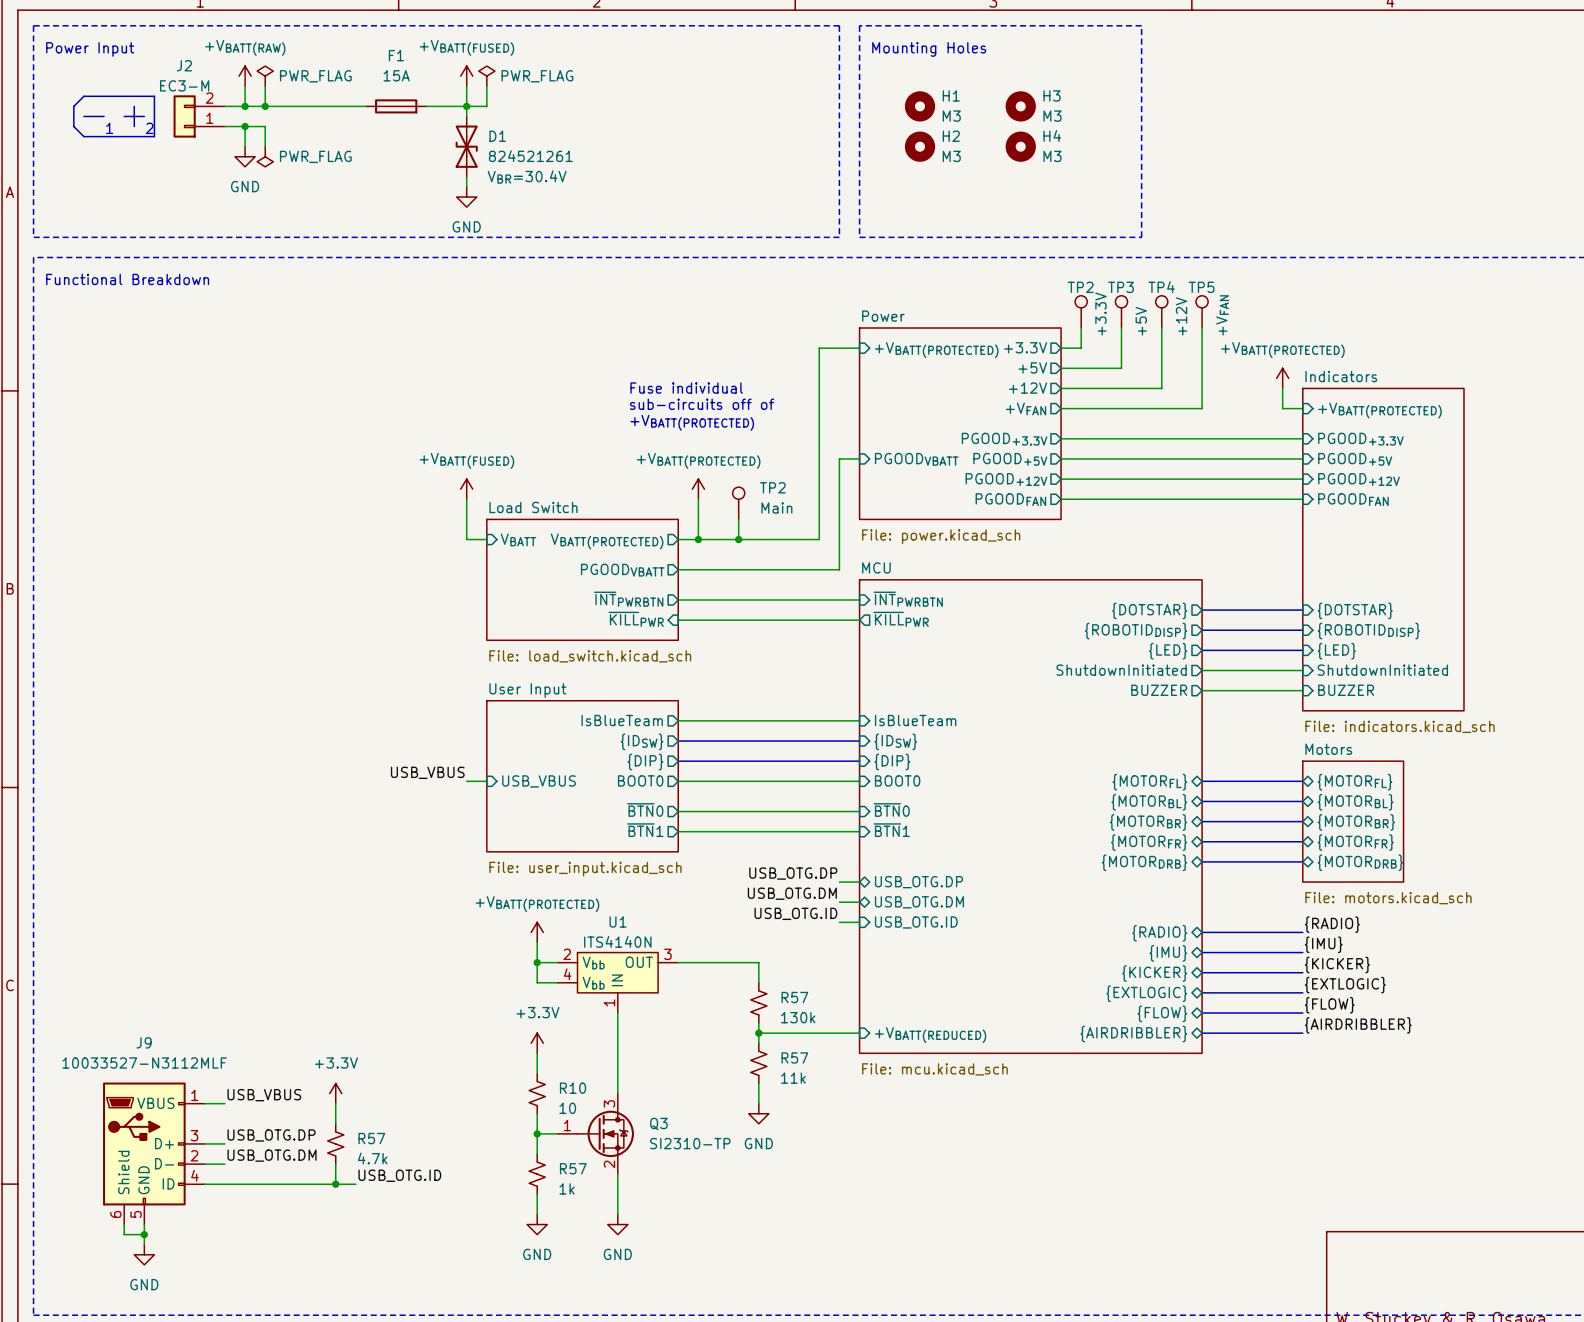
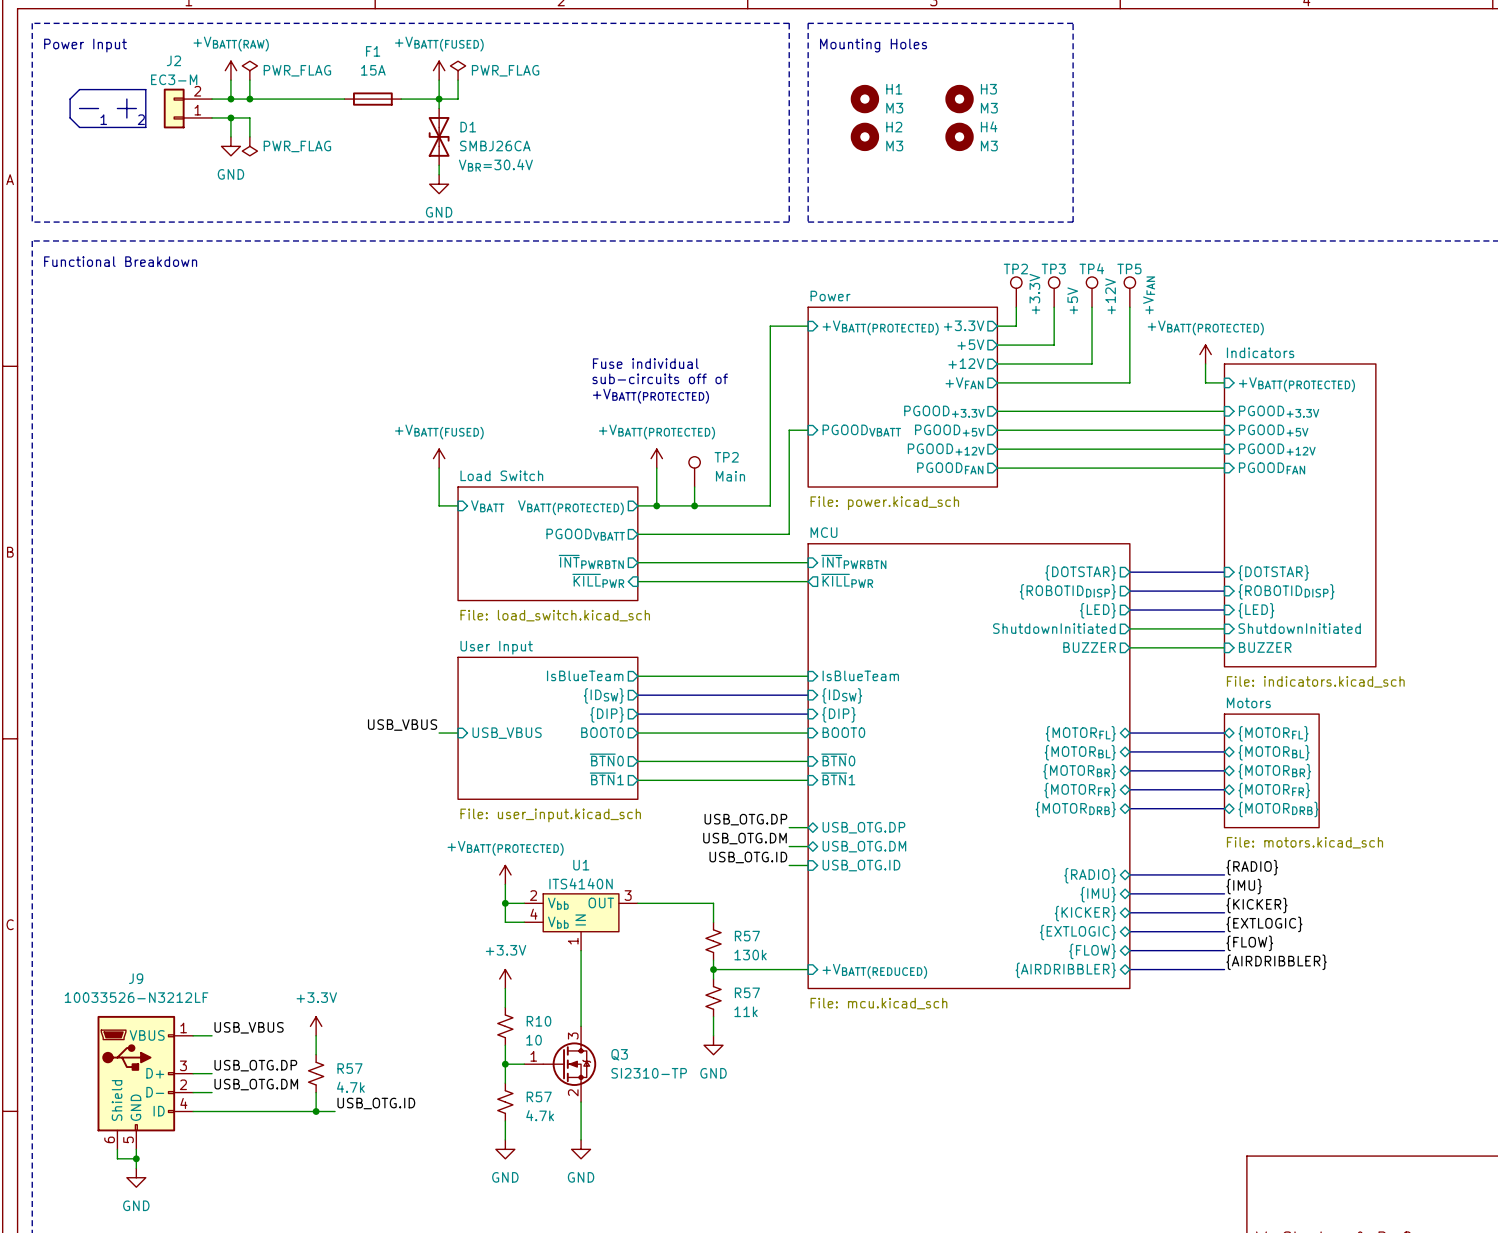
D1 value: 824521261 (530, 156) -> SMBJ26CA (495, 146)
J9 value: 10033527-N3112MLF (144, 1063) -> 10033526-N3212LF (136, 997)
R57 value: 1k (567, 1188) -> 4.7k (540, 1115)

